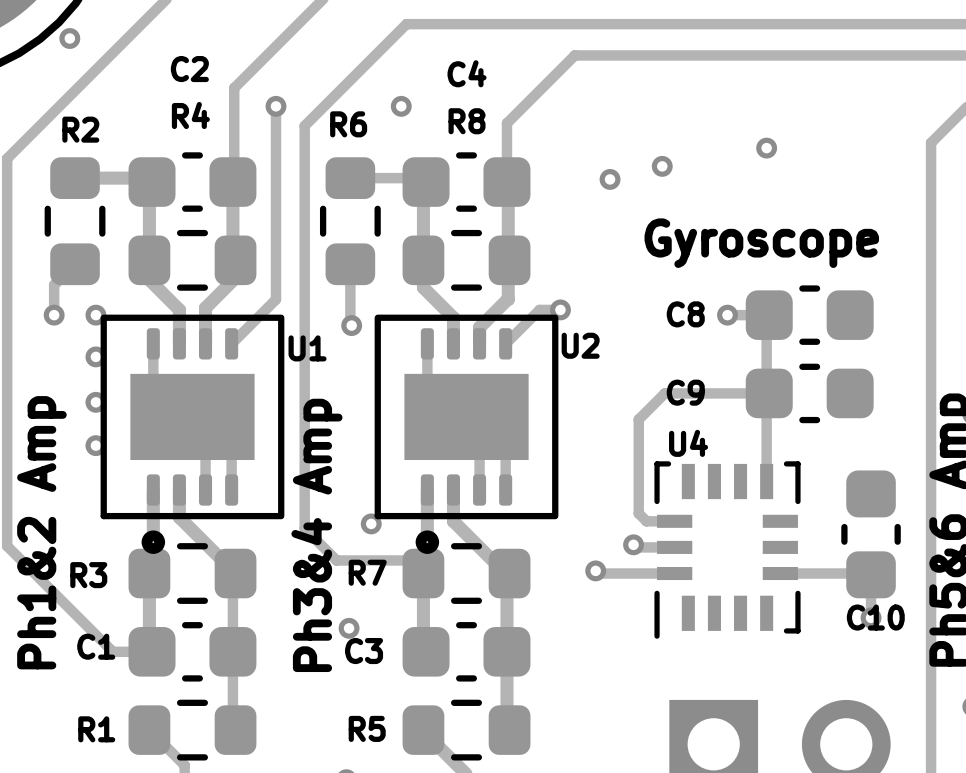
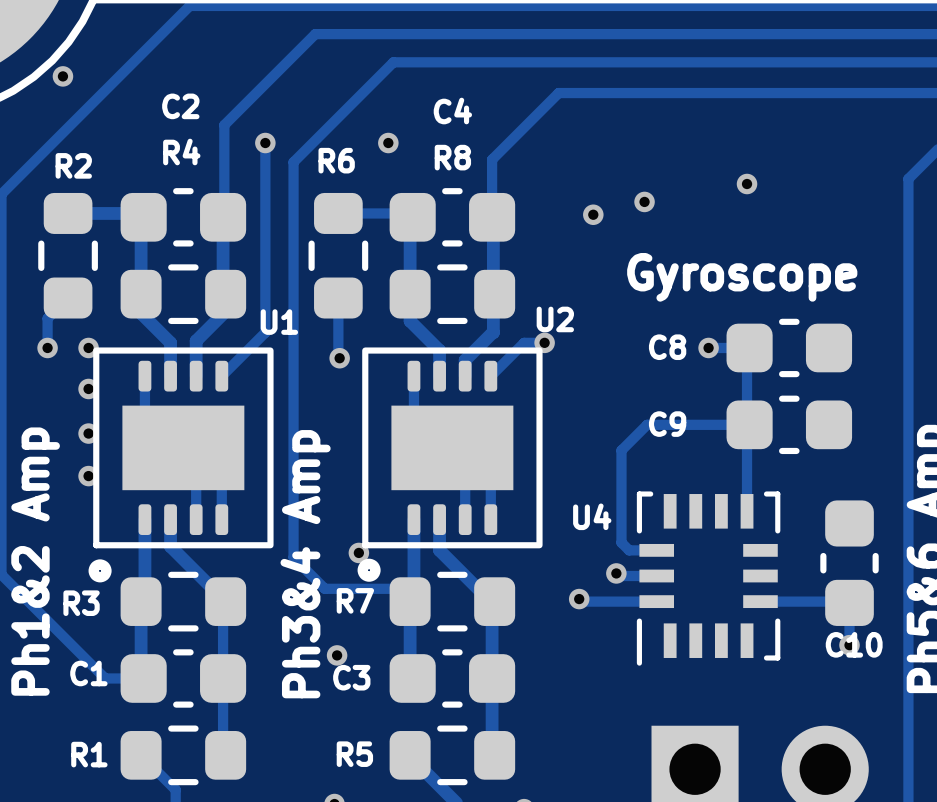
U1 footprint: [100, 314, 285, 554] -> [88, 347, 274, 583]
U2 footprint: [374, 314, 559, 554] -> [357, 347, 543, 582]
U2 name position: U2 (580, 345) -> U2 (555, 319)
U1 name position: U1 (307, 348) -> U1 (279, 322)
U4 name position: U4 (688, 443) -> U4 (592, 516)

